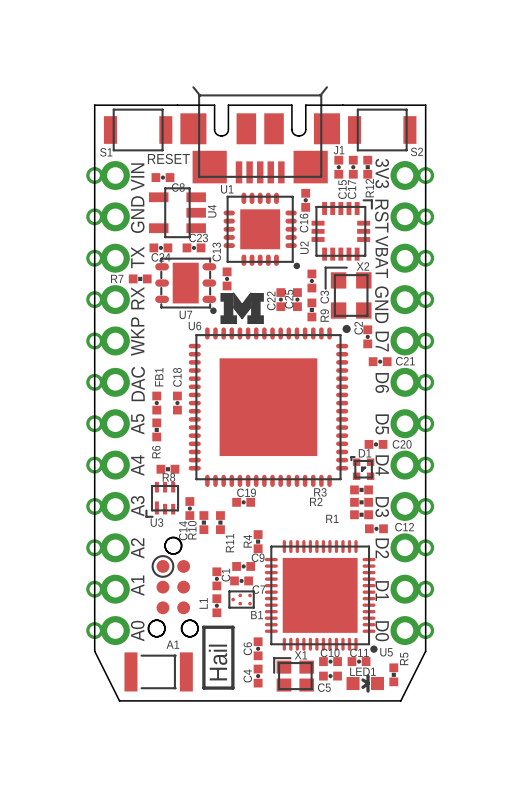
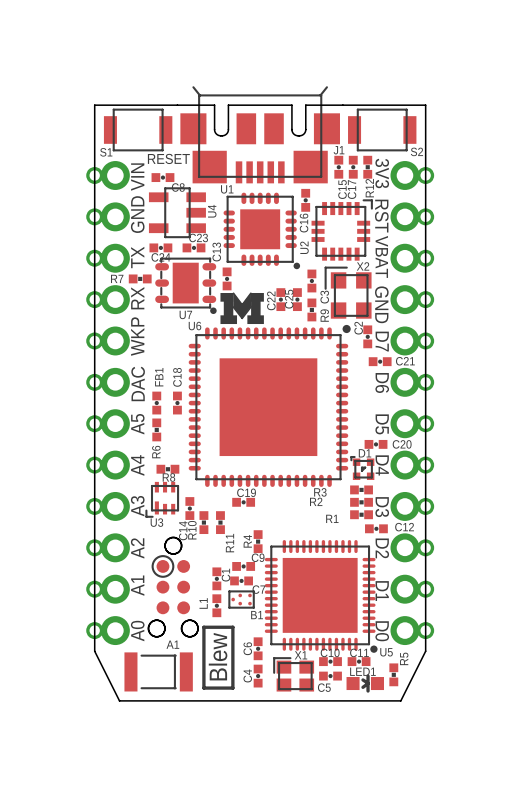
text: Hail (218, 662) -> Blew (218, 656)

